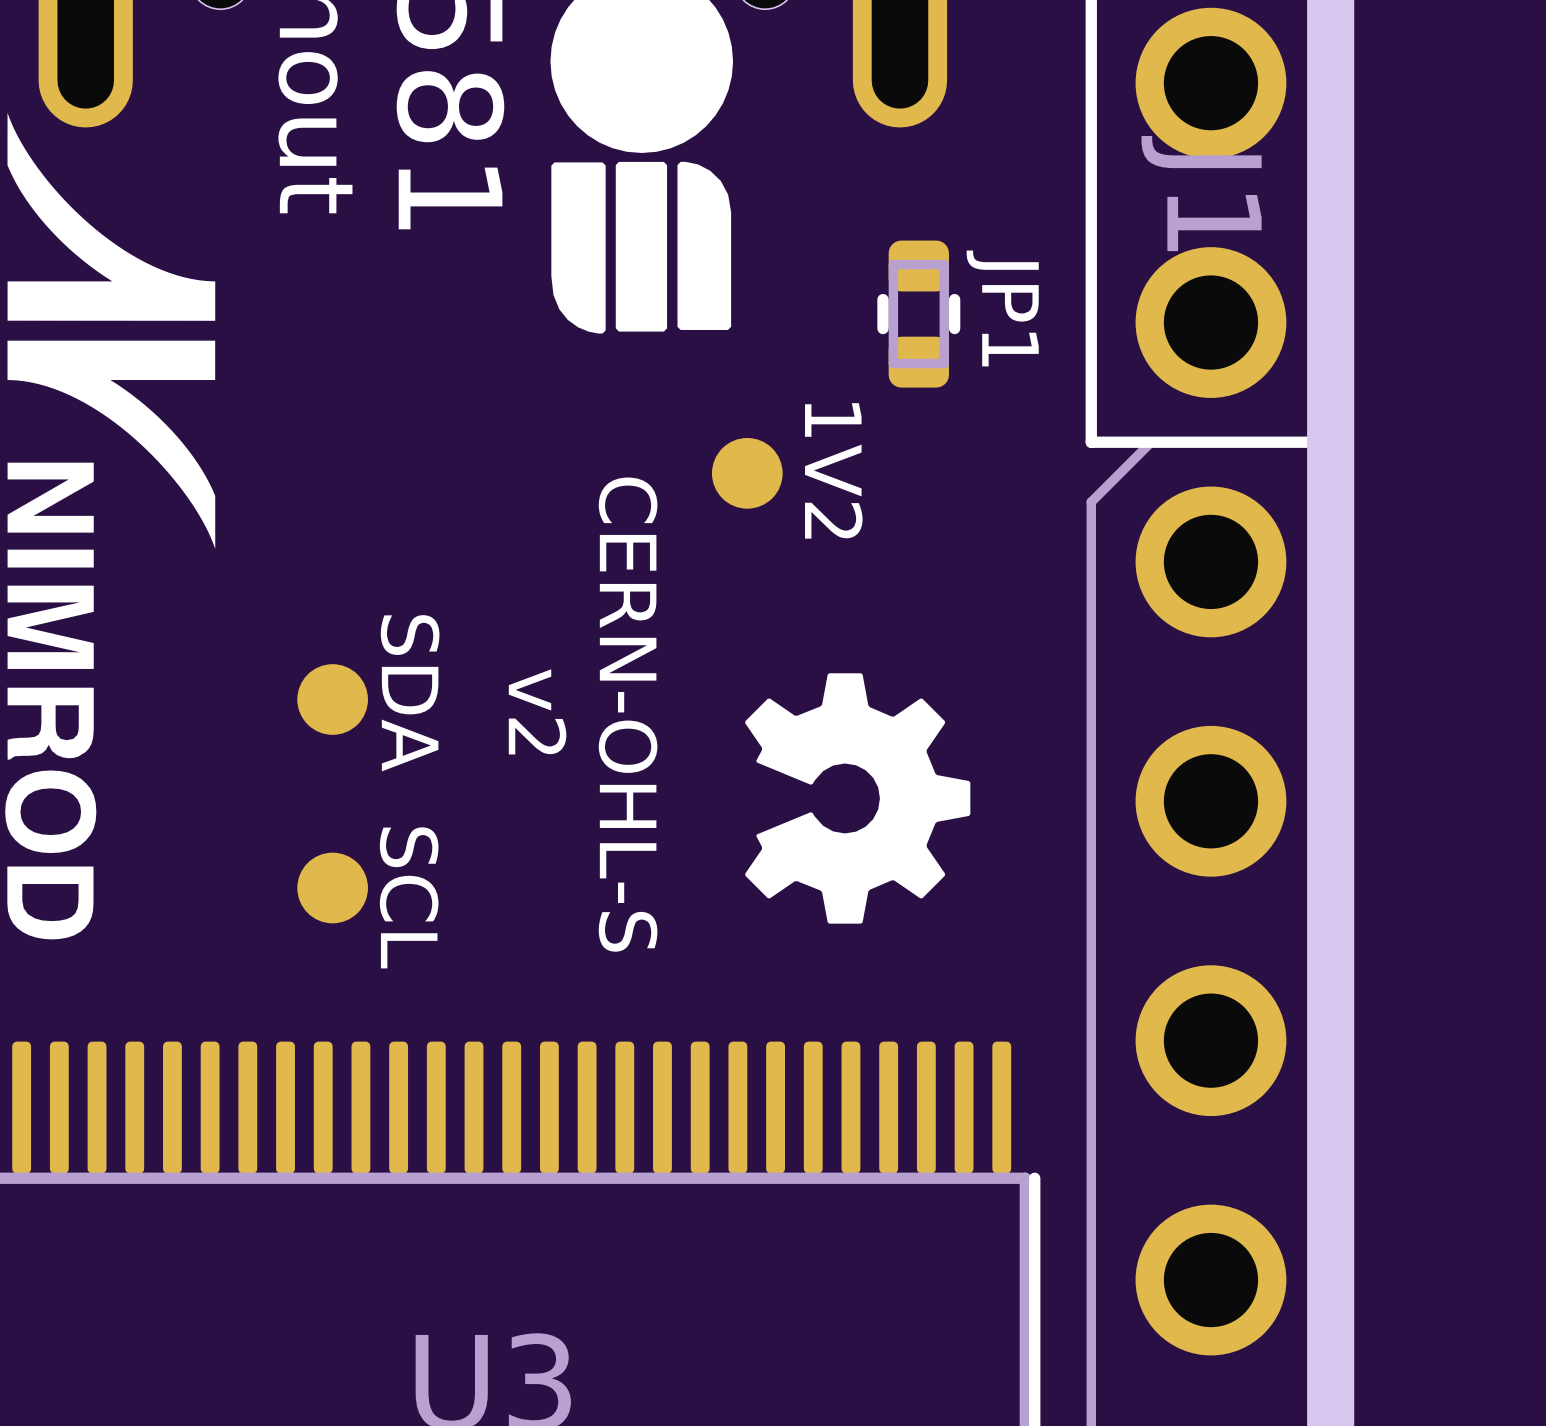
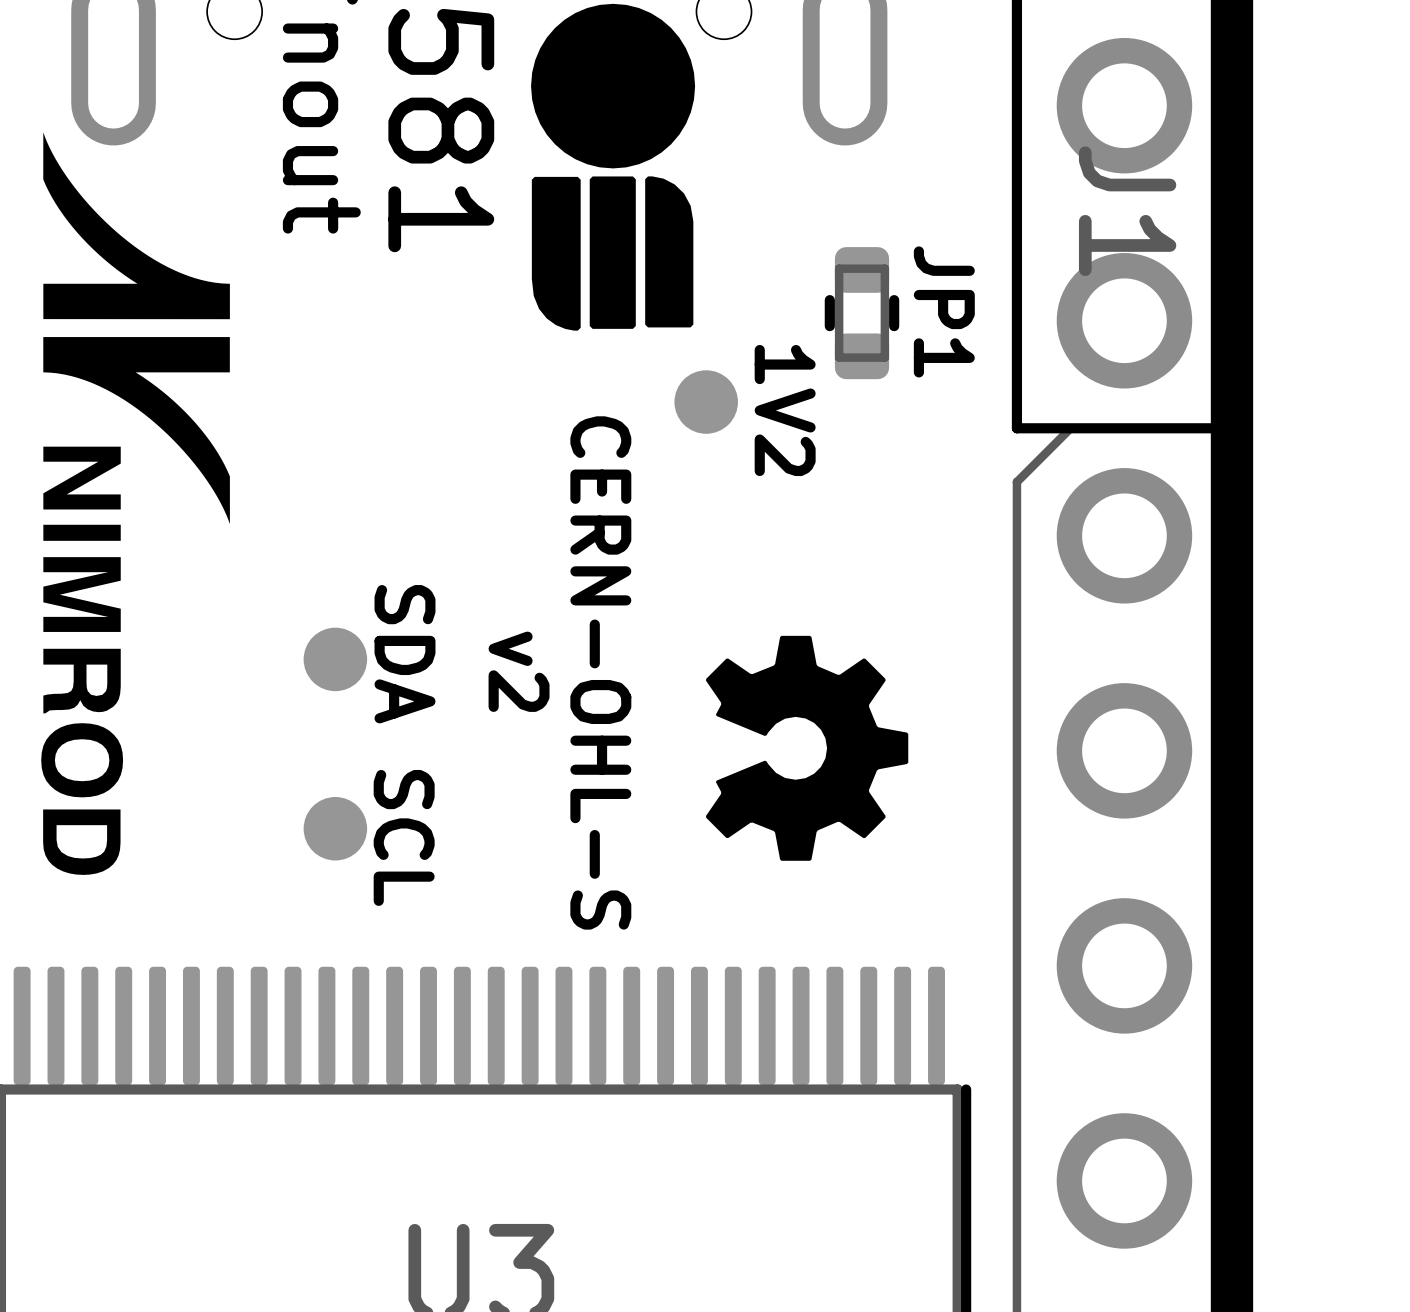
text position: 1V2 (833, 470) -> 1V2 (785, 410)
part position: (747, 473) -> (706, 402)

